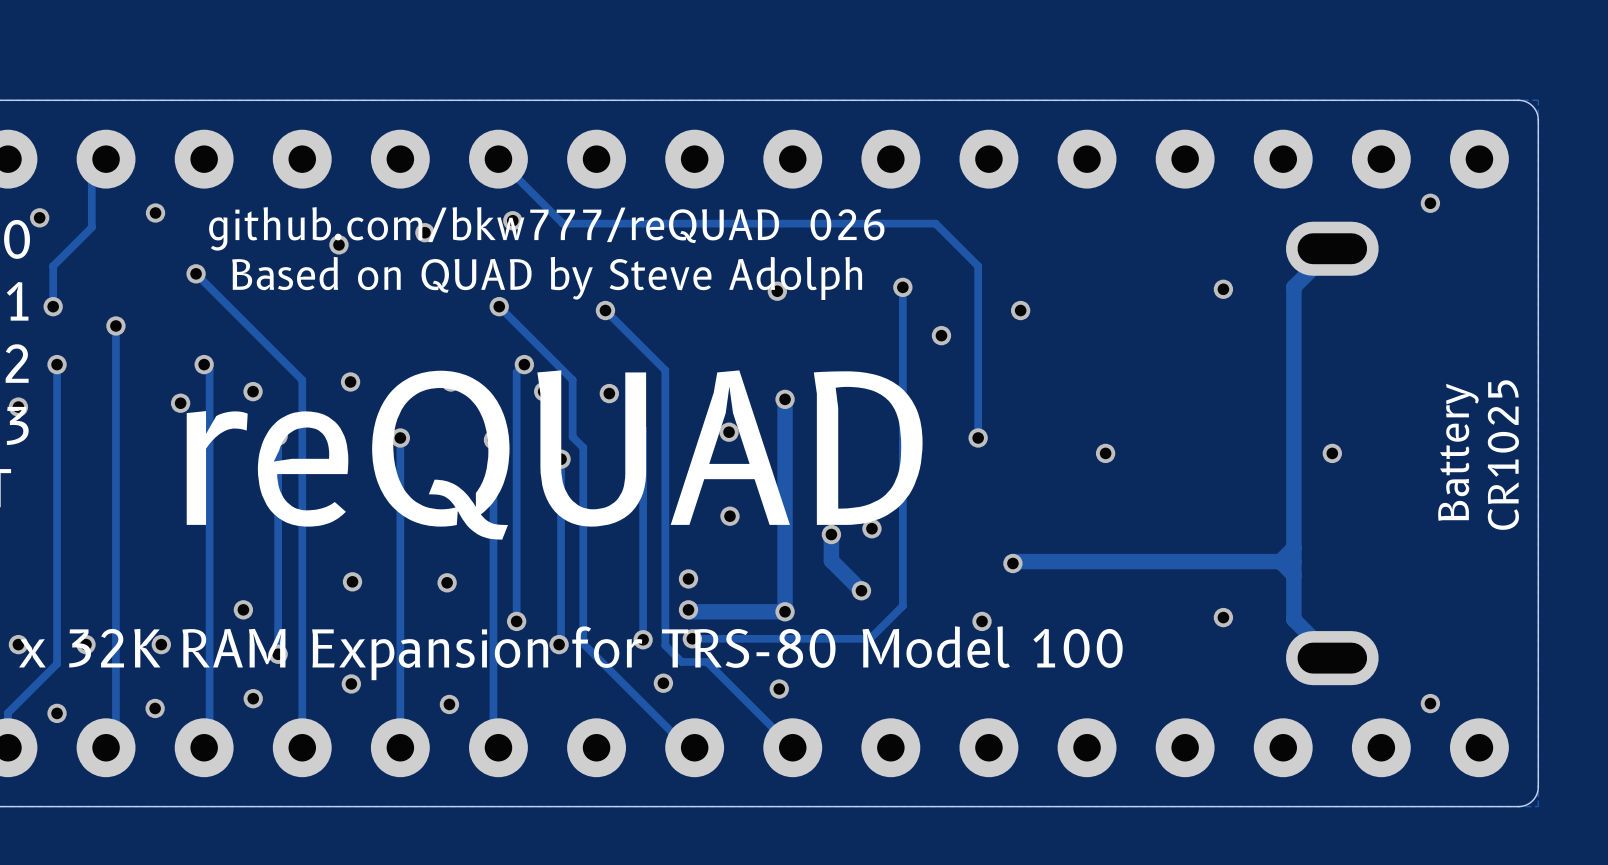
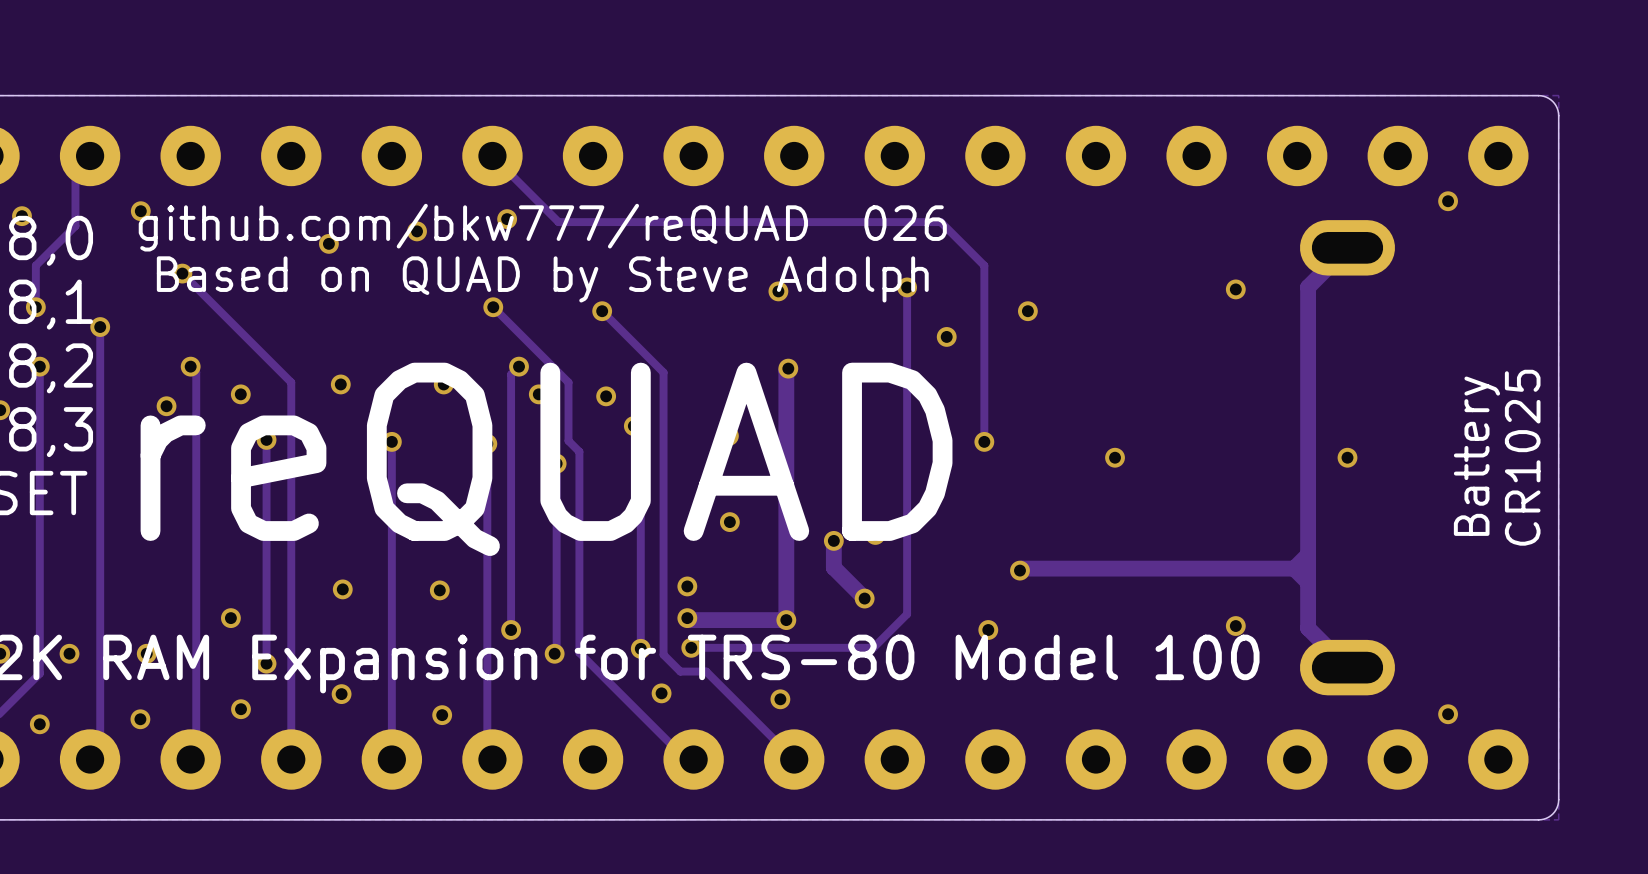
track: none -> (788, 368) (786, 370) (786, 402)
via position: (785, 399) -> (788, 368)

